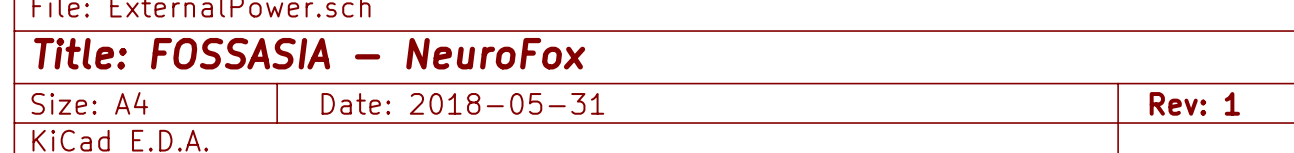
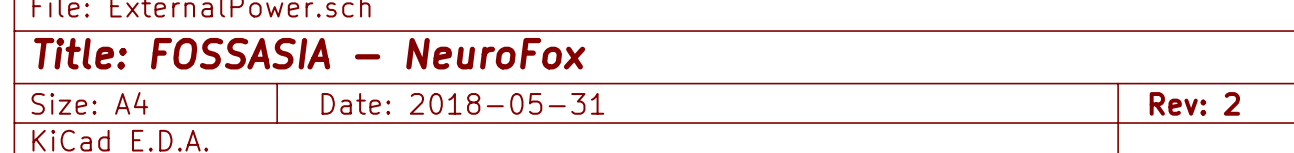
title block: Rev: 1 (1194, 103) -> Rev: 2 (1194, 103)

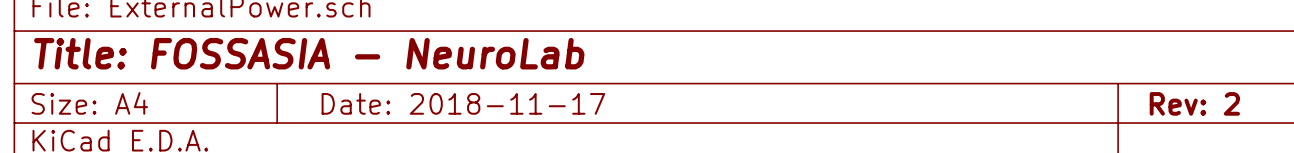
title block: Title: FOSSASIA - NeuroFox (309, 53) -> Title: FOSSASIA - NeuroLab (309, 53)
title block: Date: 2018-05-31 (462, 103) -> Date: 2018-11-17 (463, 103)

